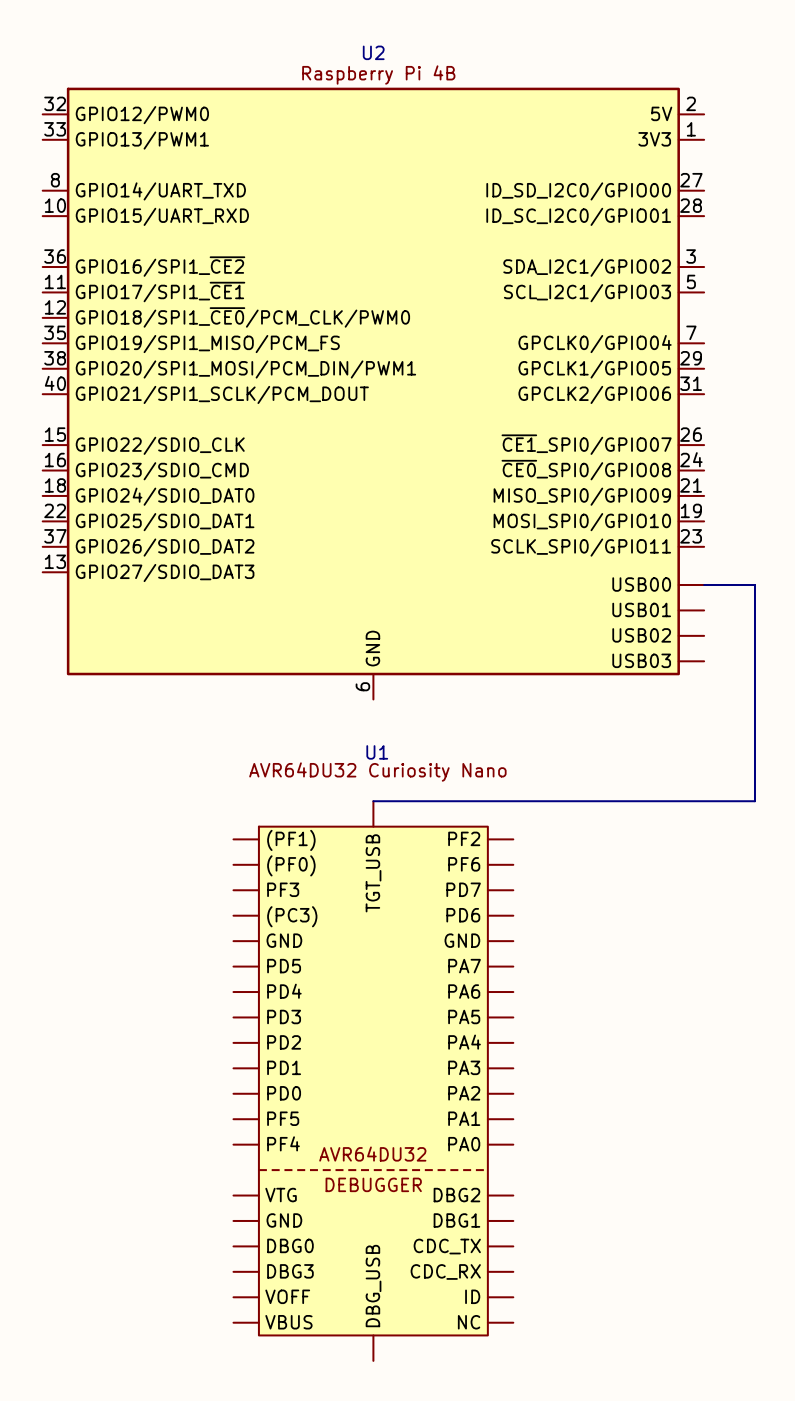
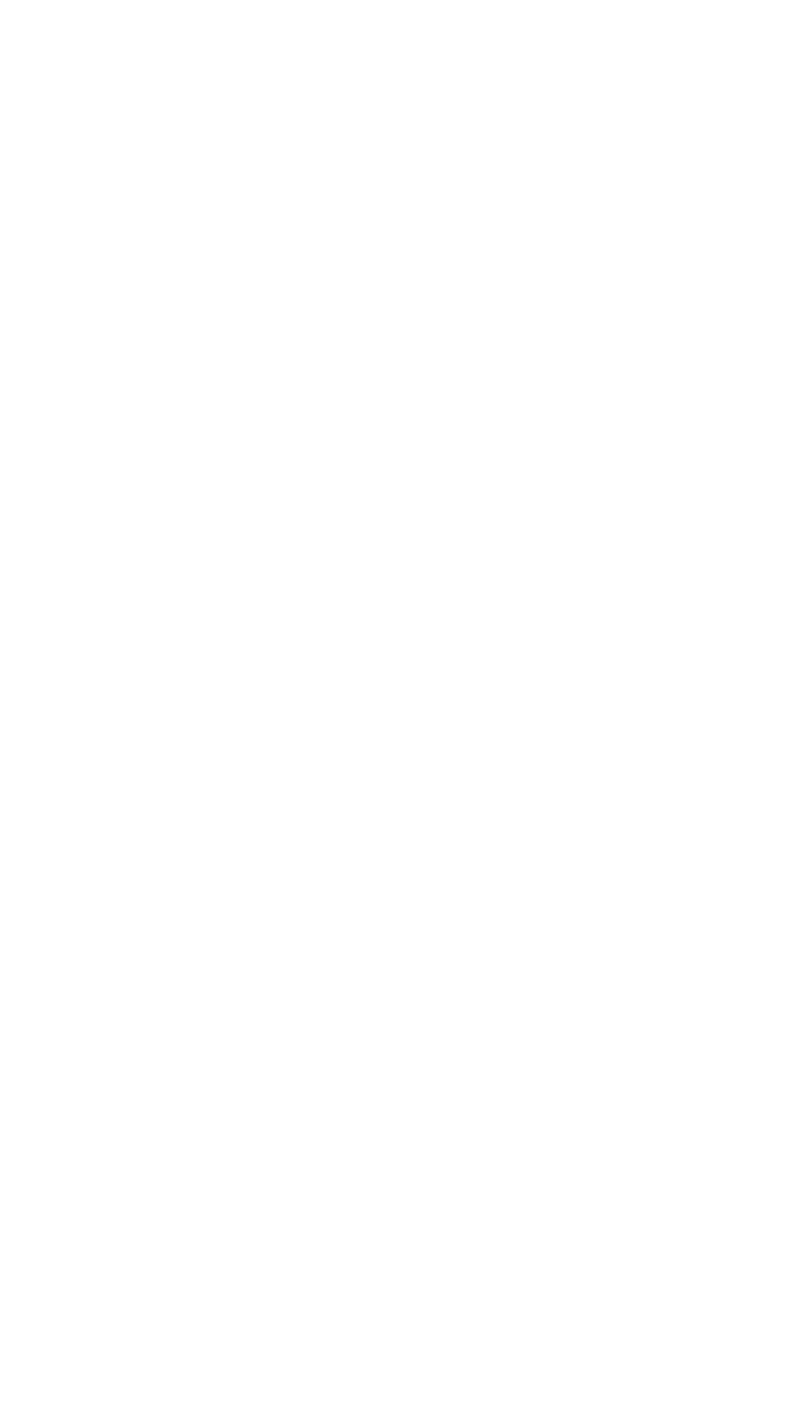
U2: (373, 393) -> none
wire: (704, 584) (754, 584) (754, 801) (373, 801) -> none
U1: (373, 1081) -> none

